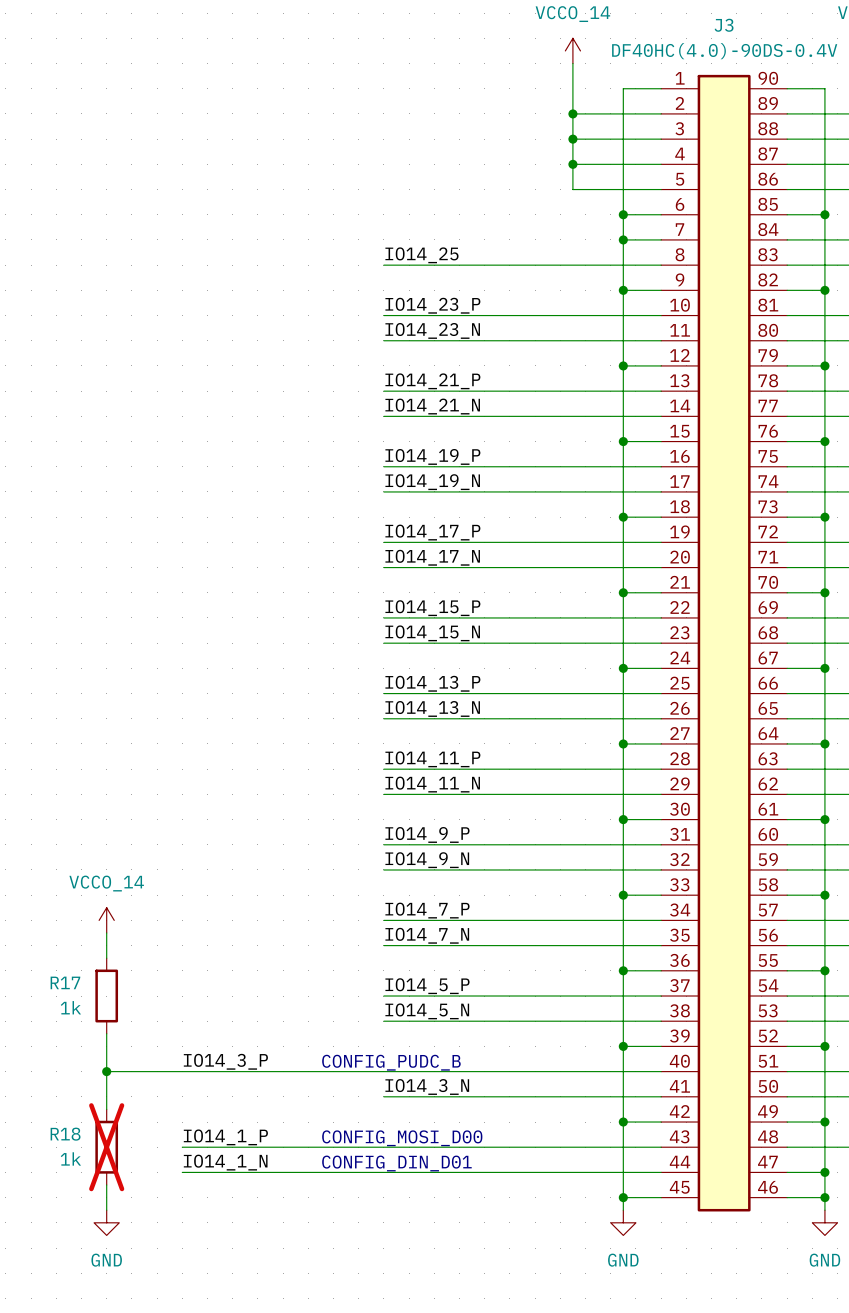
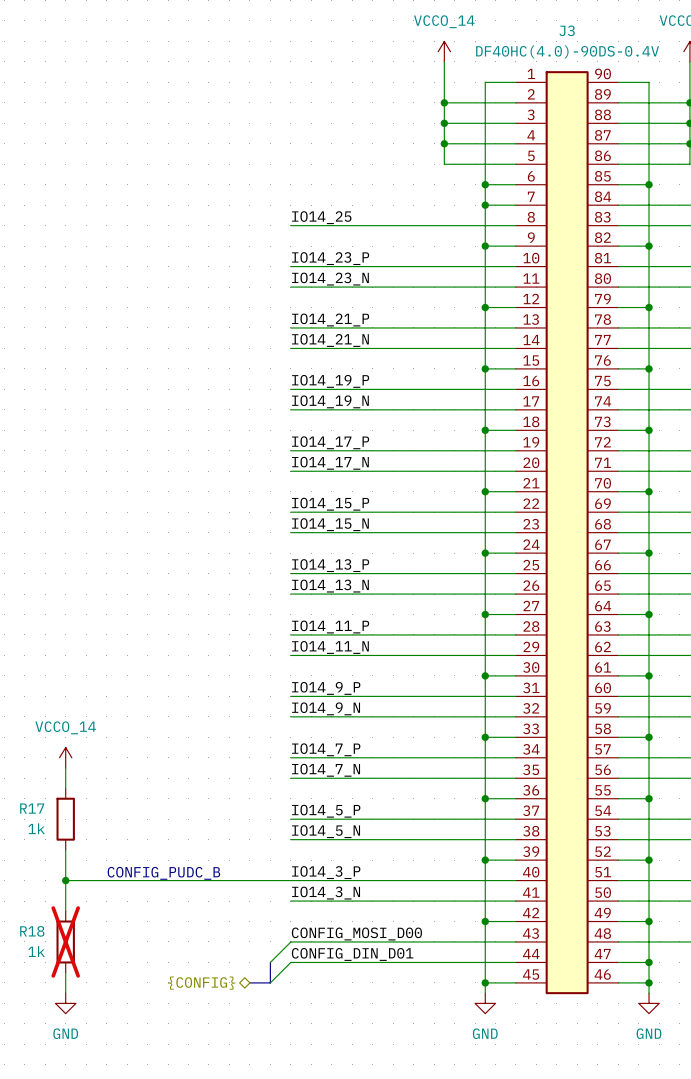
label position: IO14_3_P (225, 1061) -> IO14_3_P (326, 872)
text position: CONFIG_PUDC_B (391, 1062) -> CONFIG_PUDC_B (163, 873)
label: IO14_1_P (225, 1137) -> none
label: none -> CONFIG_MOSI_D00 (356, 934)
text: CONFIG_MOSI_D00 (402, 1138) -> none
wire: (182, 1147) (383, 1147) -> (270, 962) (290, 941)
label: IO14_1_N (225, 1162) -> none
label: none -> CONFIG_DIN_D01 (352, 954)
text: CONFIG_DIN_D01 (396, 1163) -> none
wire: (182, 1172) (383, 1172) -> (270, 982) (290, 962)
bus: none -> (270, 962) (270, 982) (249, 982)
hierarchical label: none -> {CONFIG} (201, 983)

